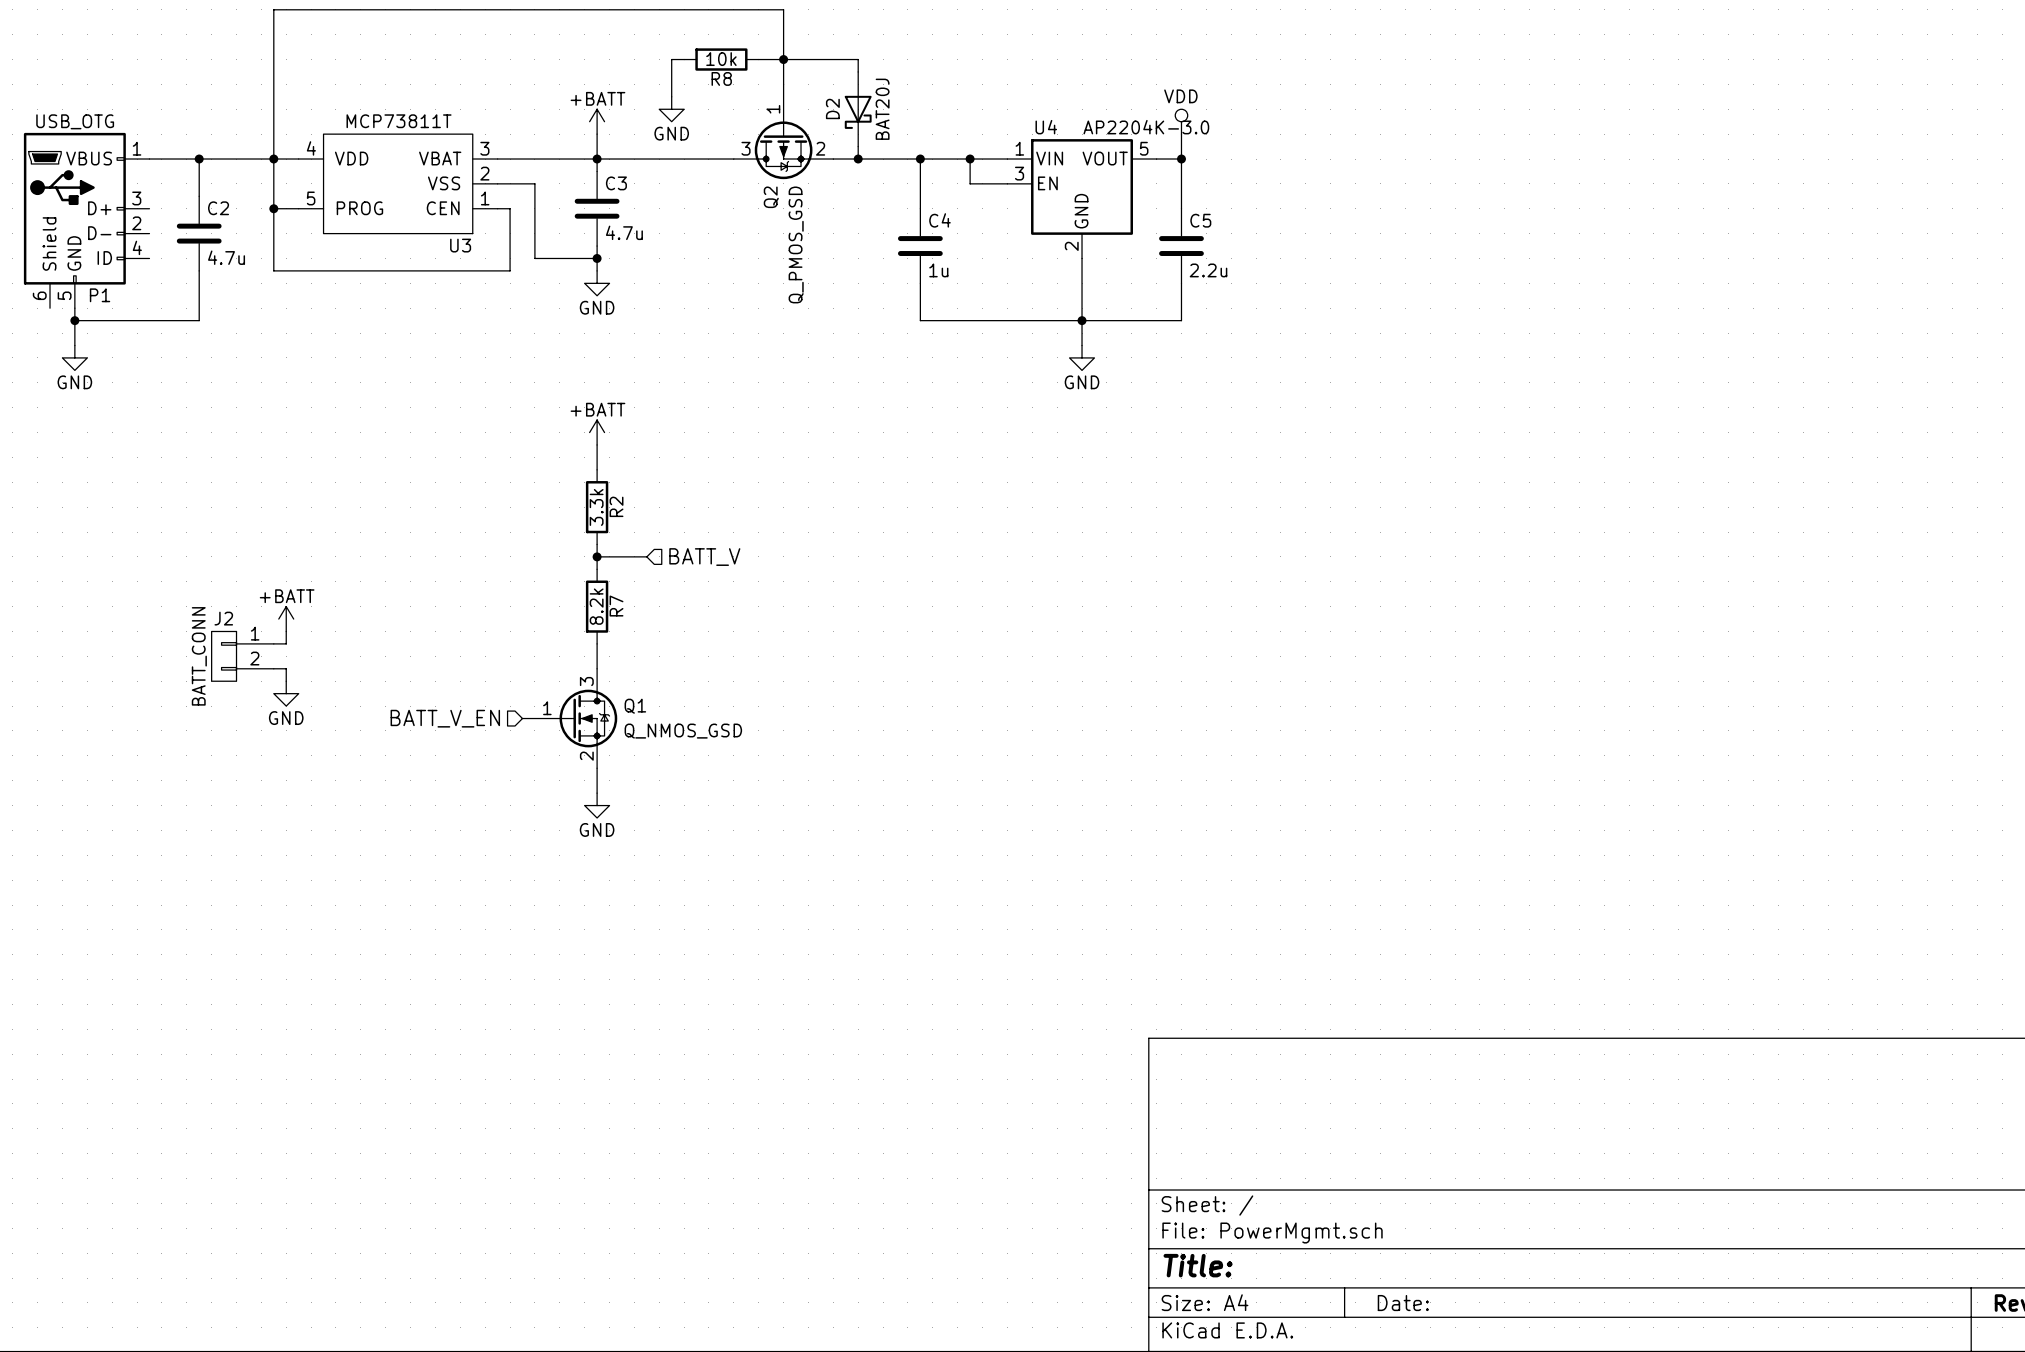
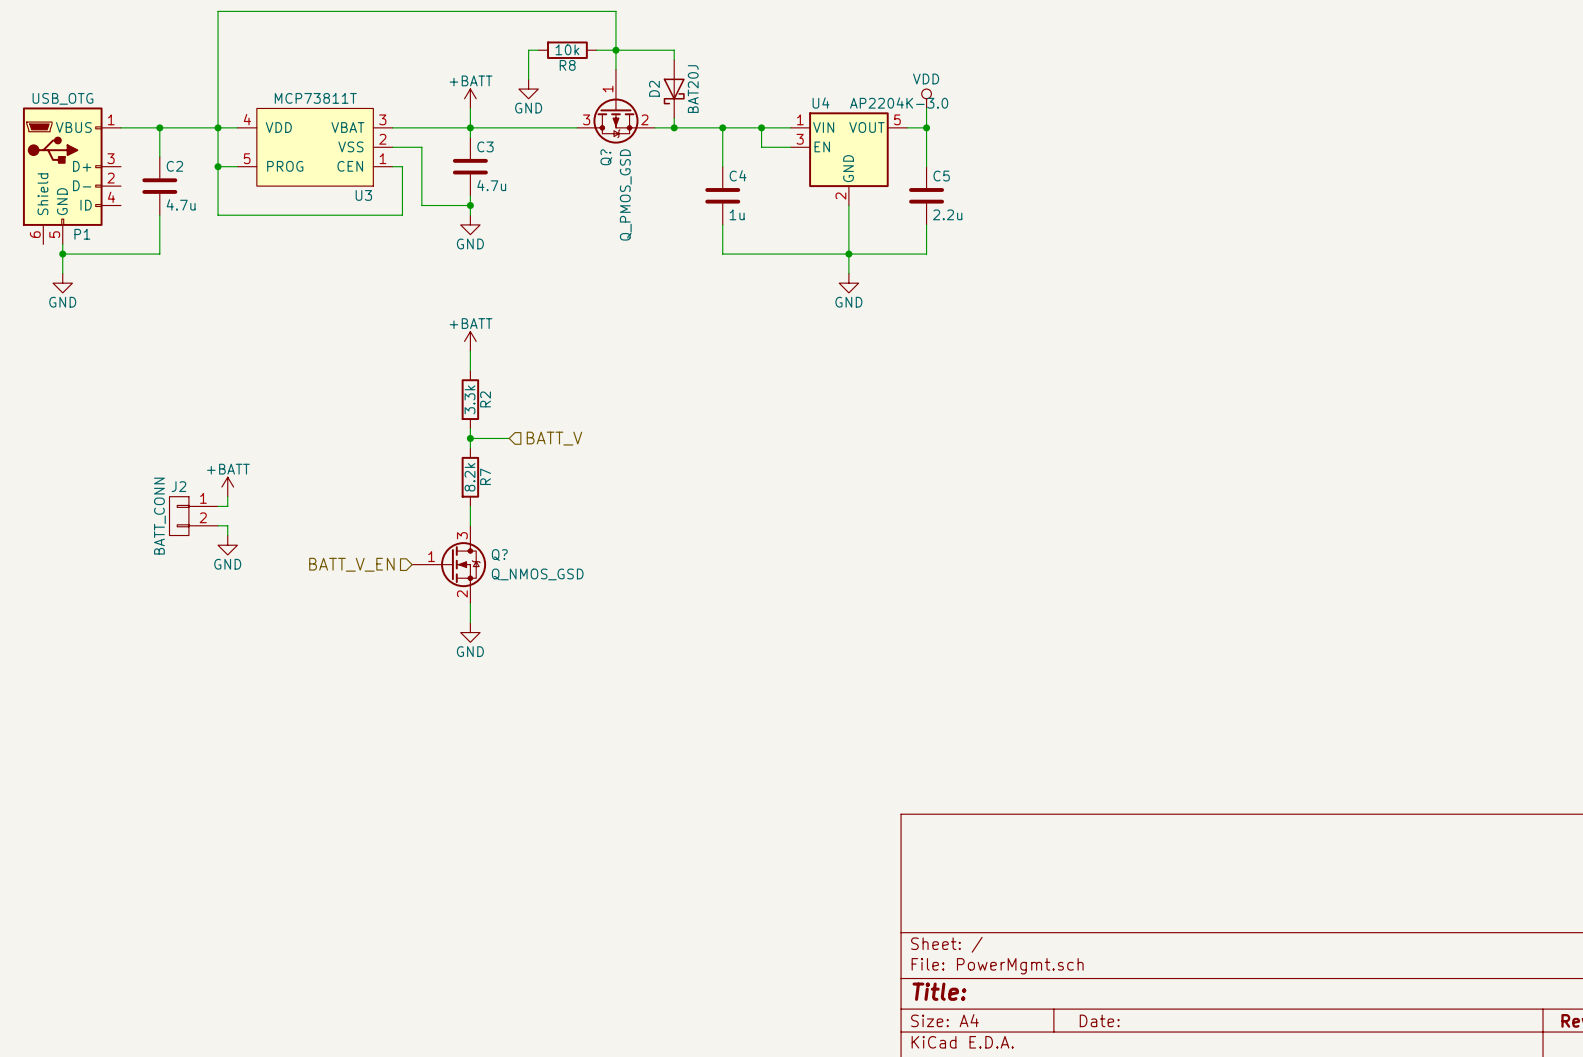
Q2 name: Q2 (771, 197) -> Q? (606, 157)
Q1 name: Q1 (635, 706) -> Q? (499, 555)

